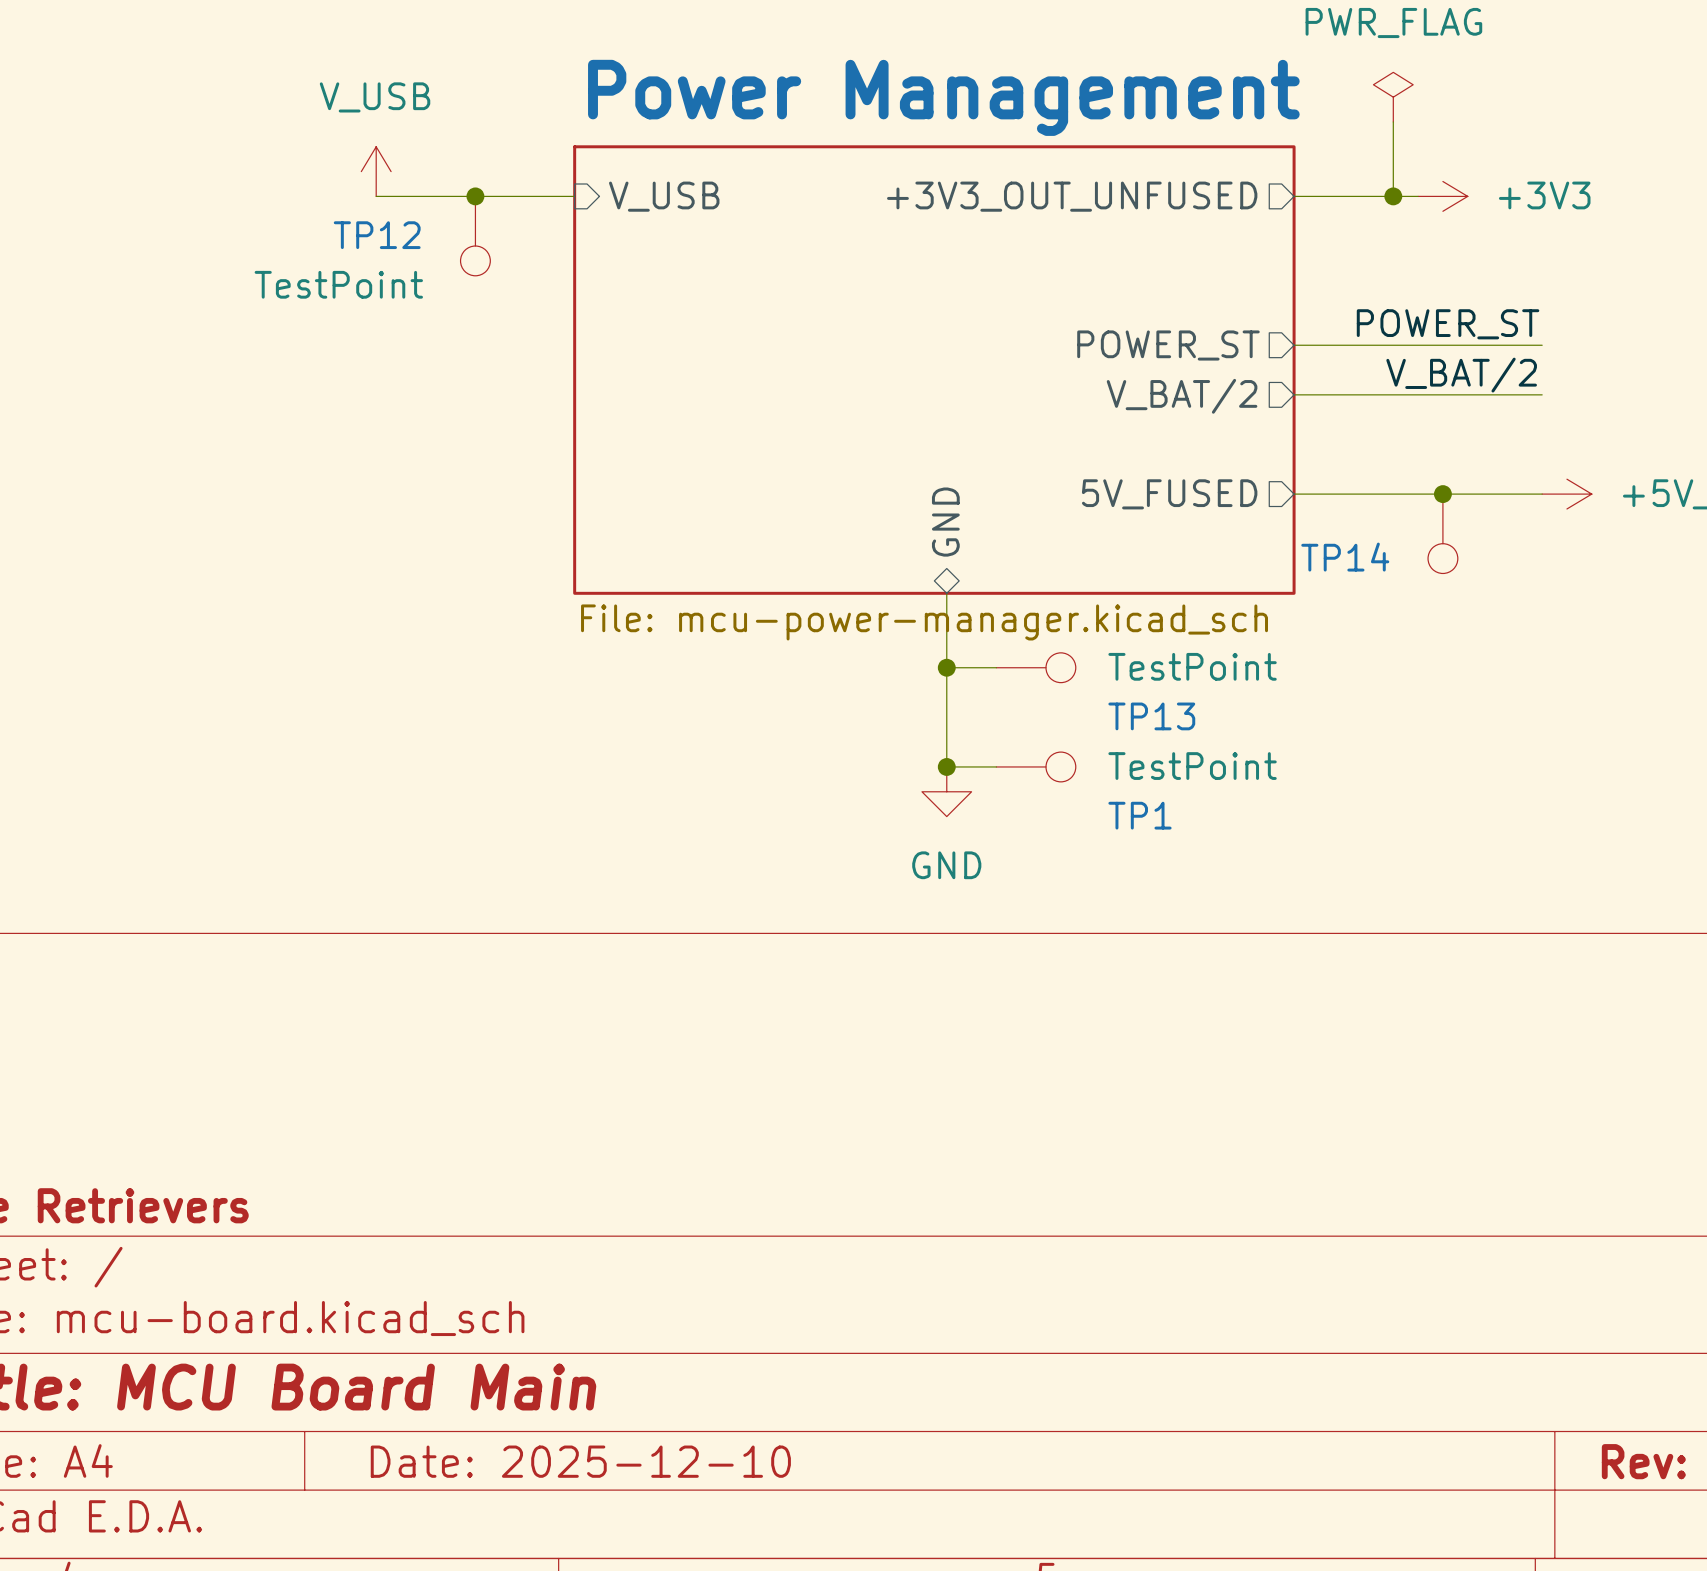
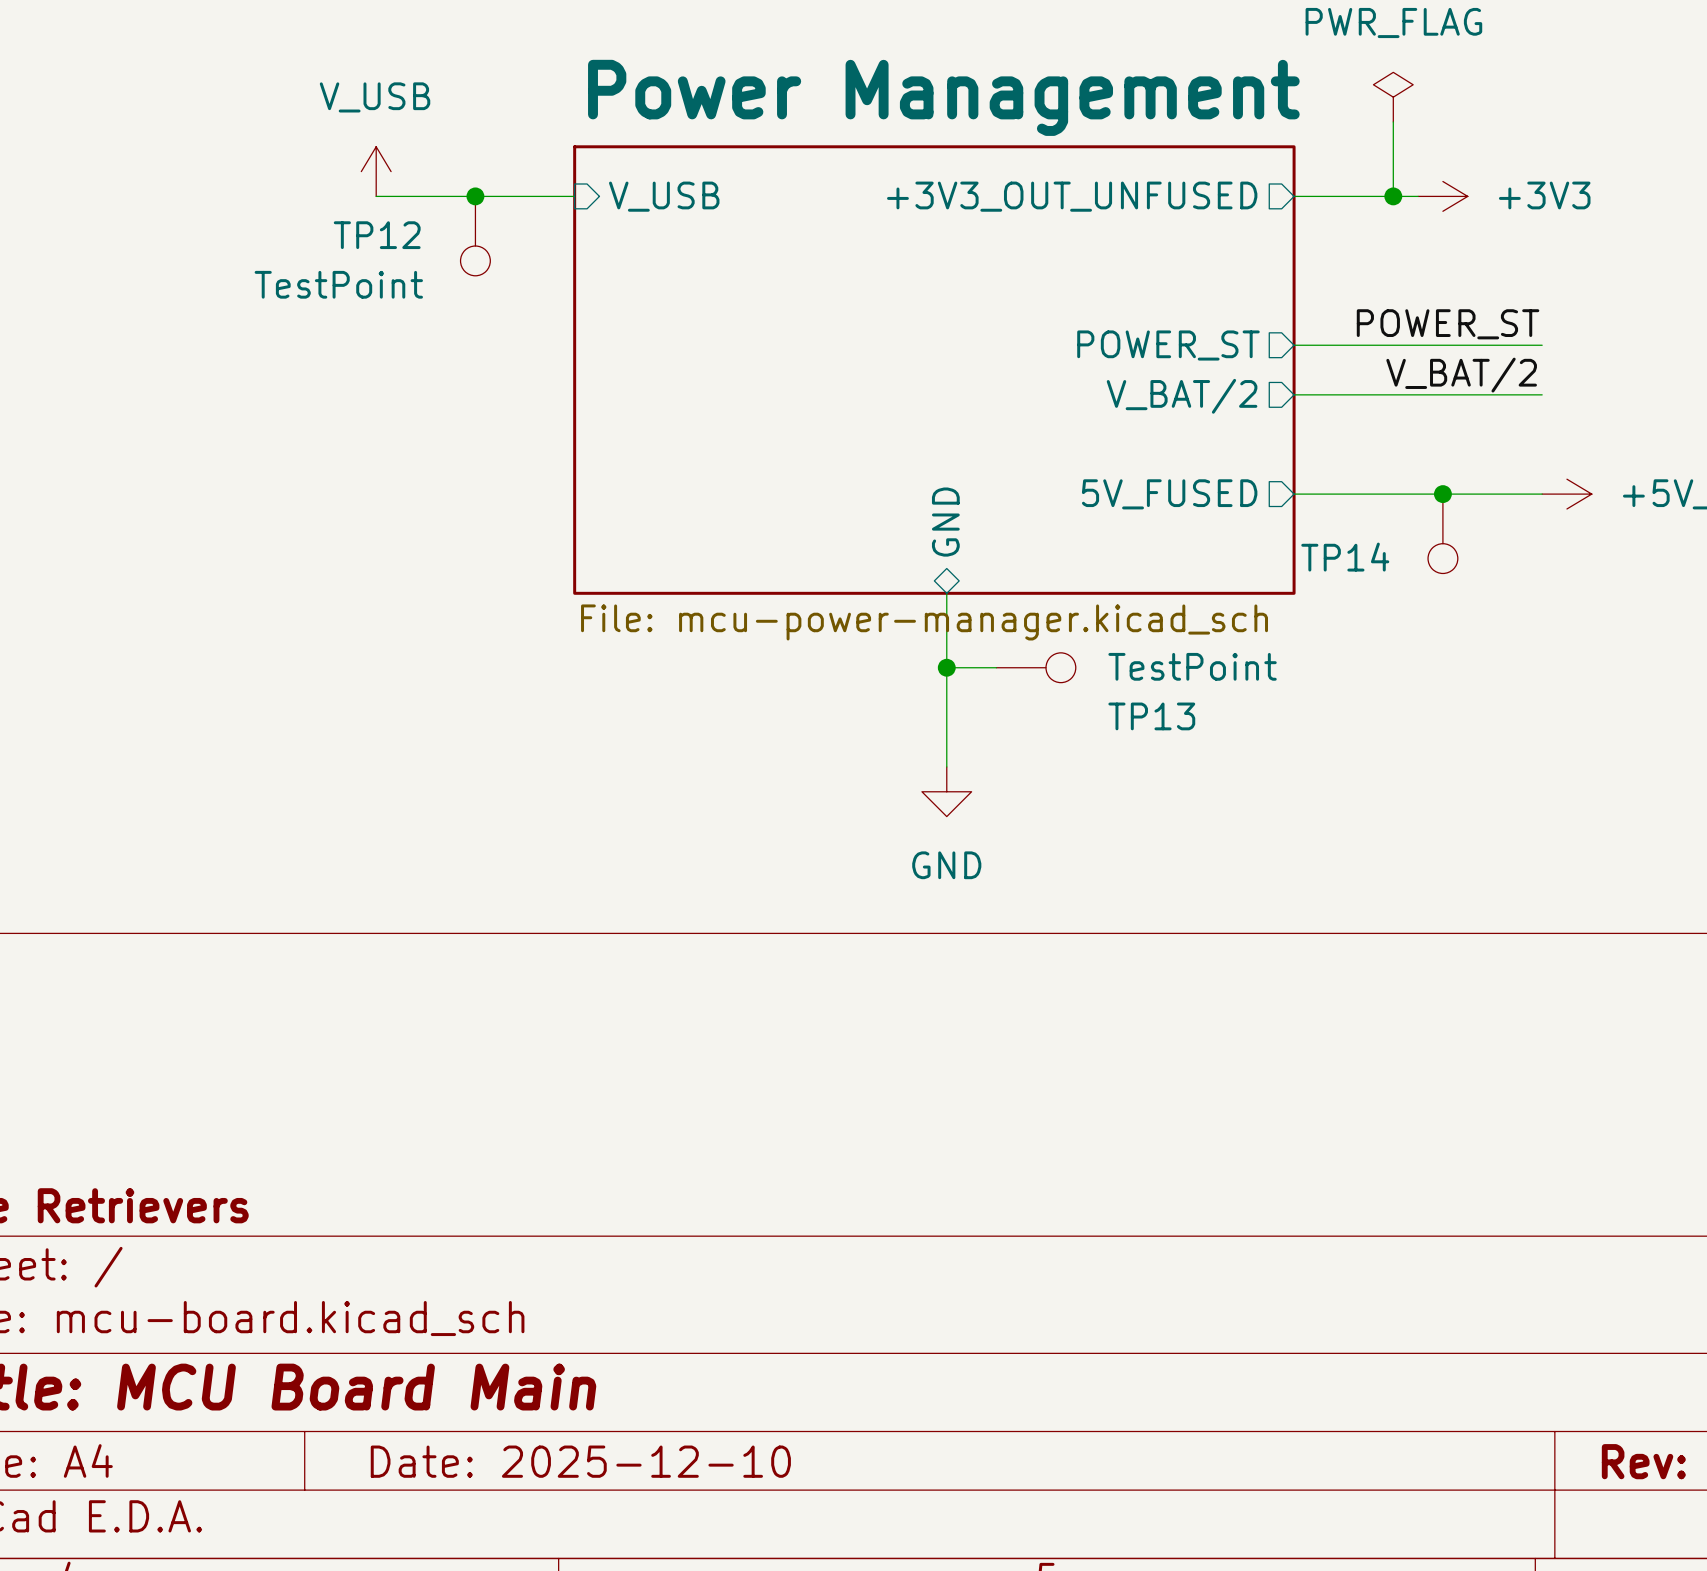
wire: (946, 766) (996, 766) -> none
junction: (946, 766) -> none
TP1: TestPoint (1036, 766) -> none

